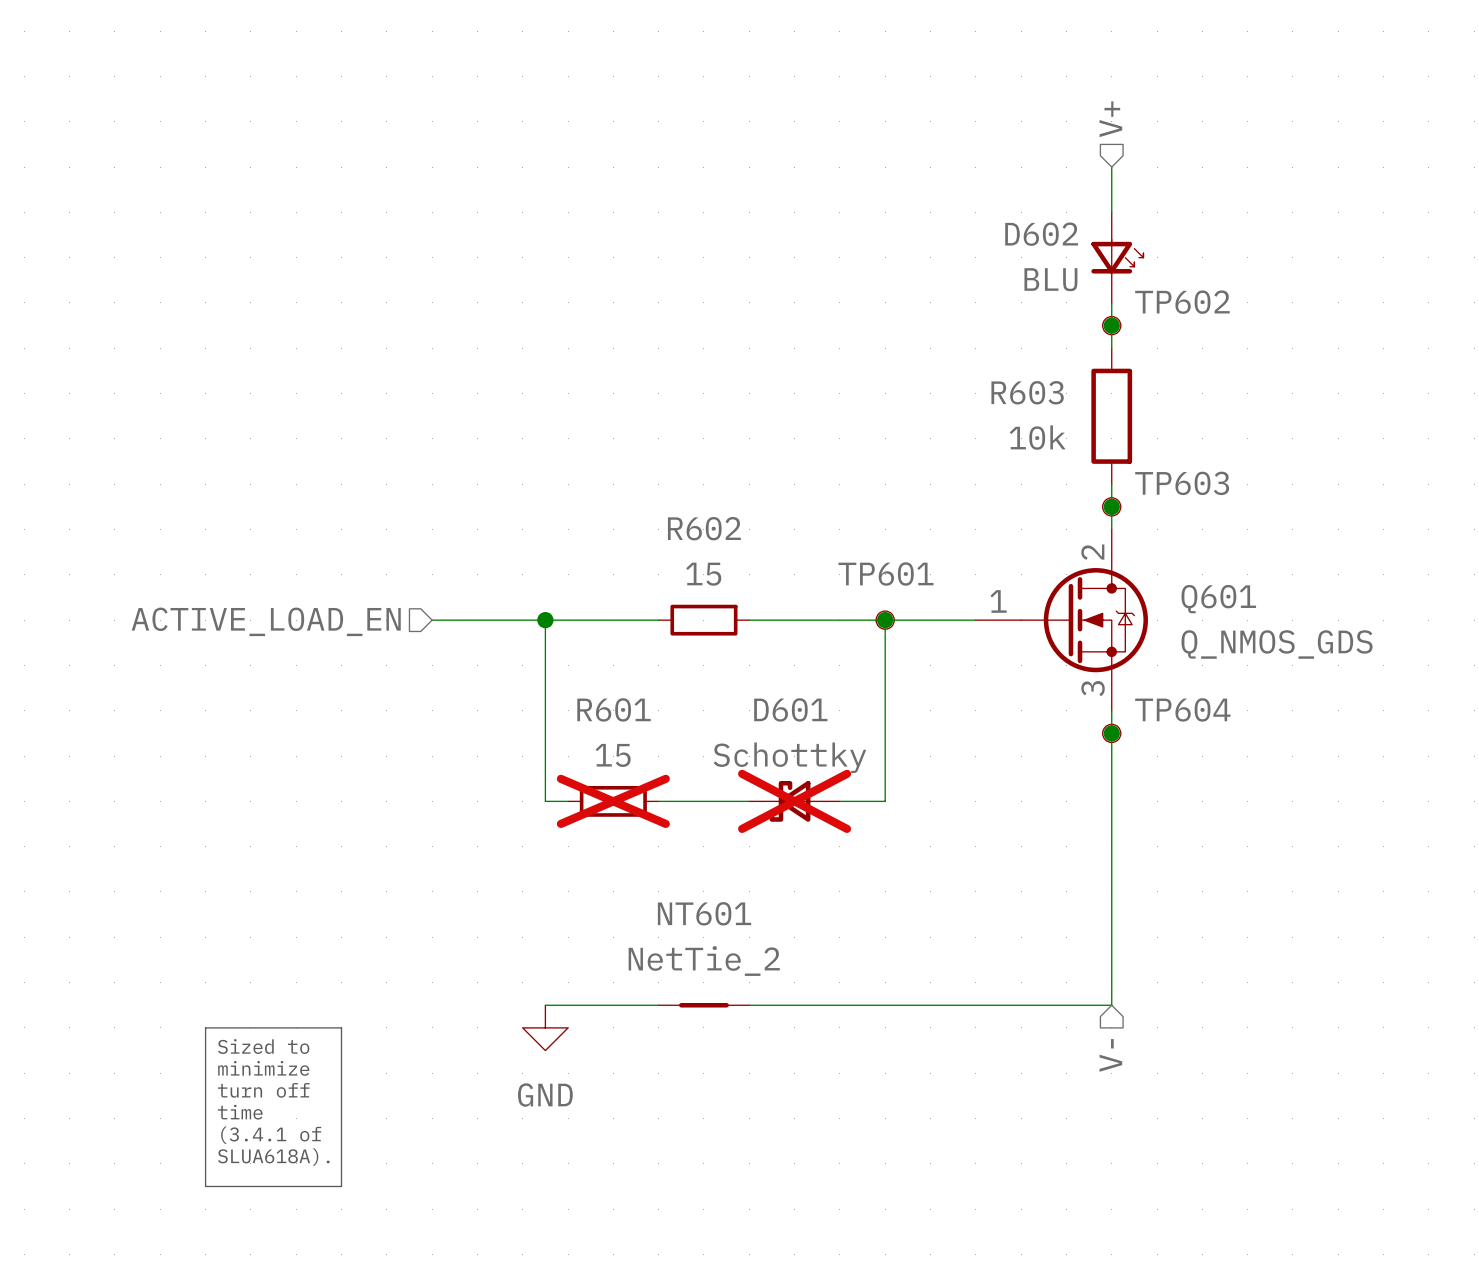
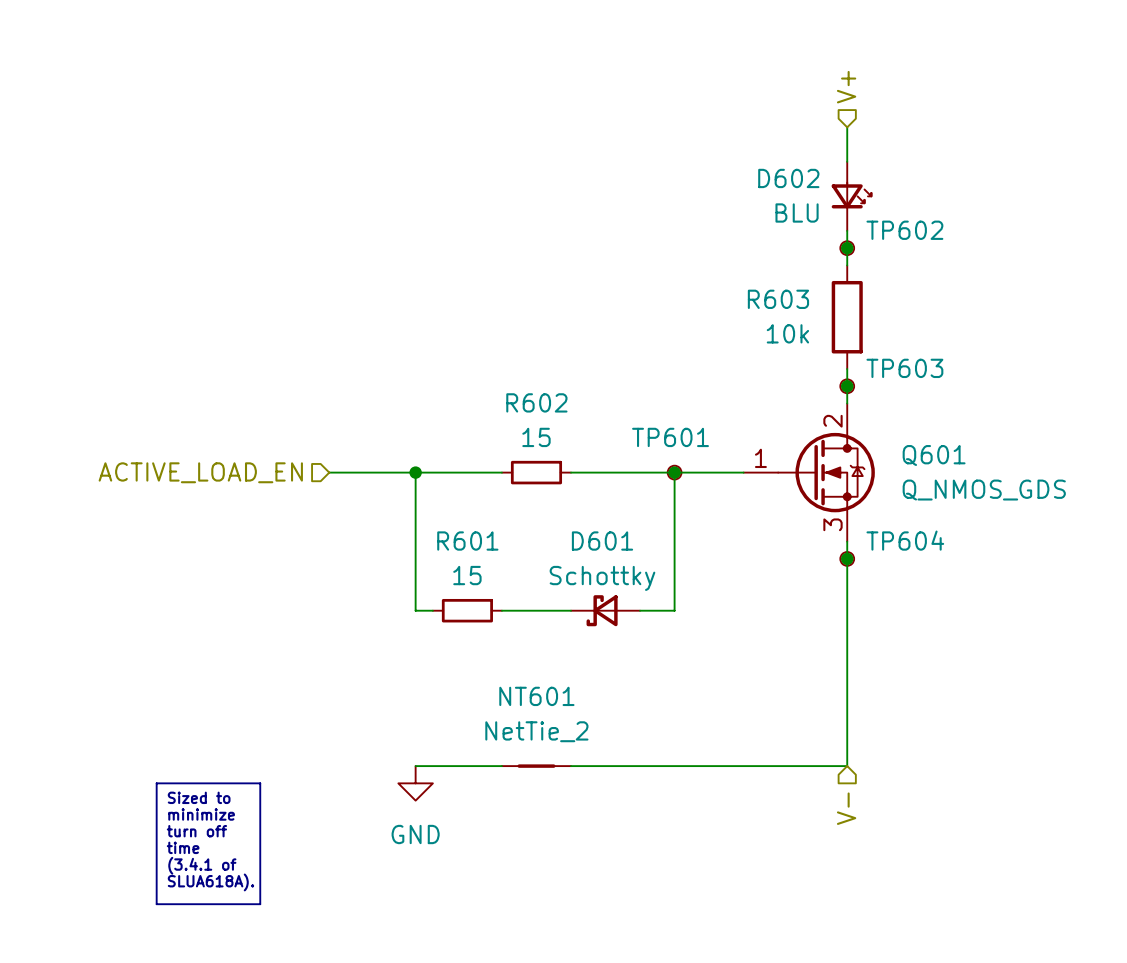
R601 do-not-place cross: (613, 801) -> none
D601 do-not-place cross: (794, 801) -> none

